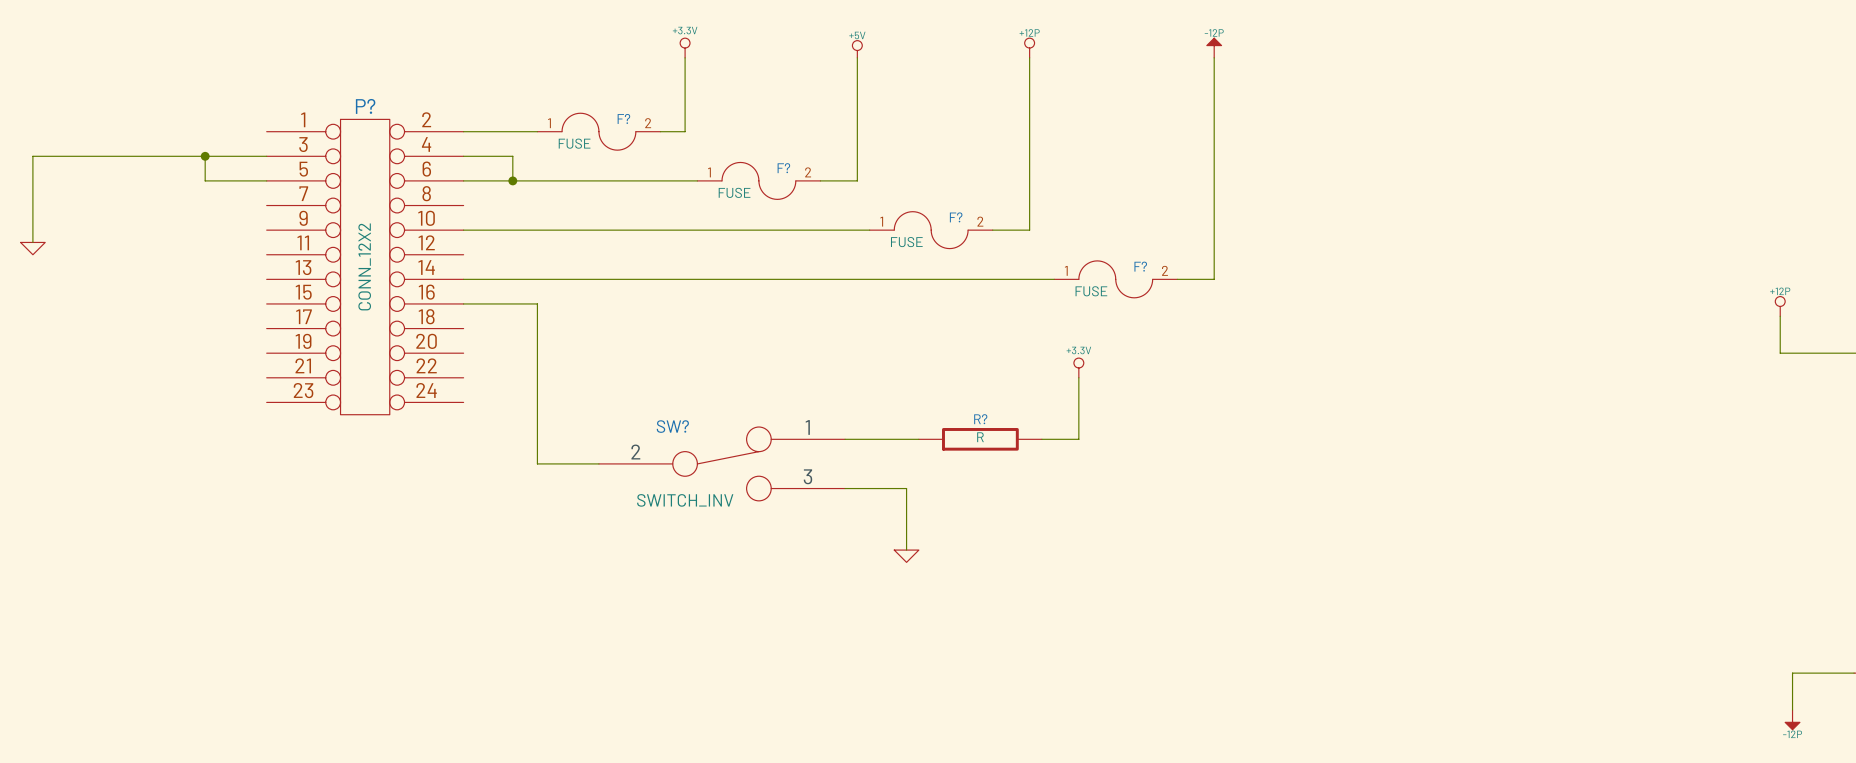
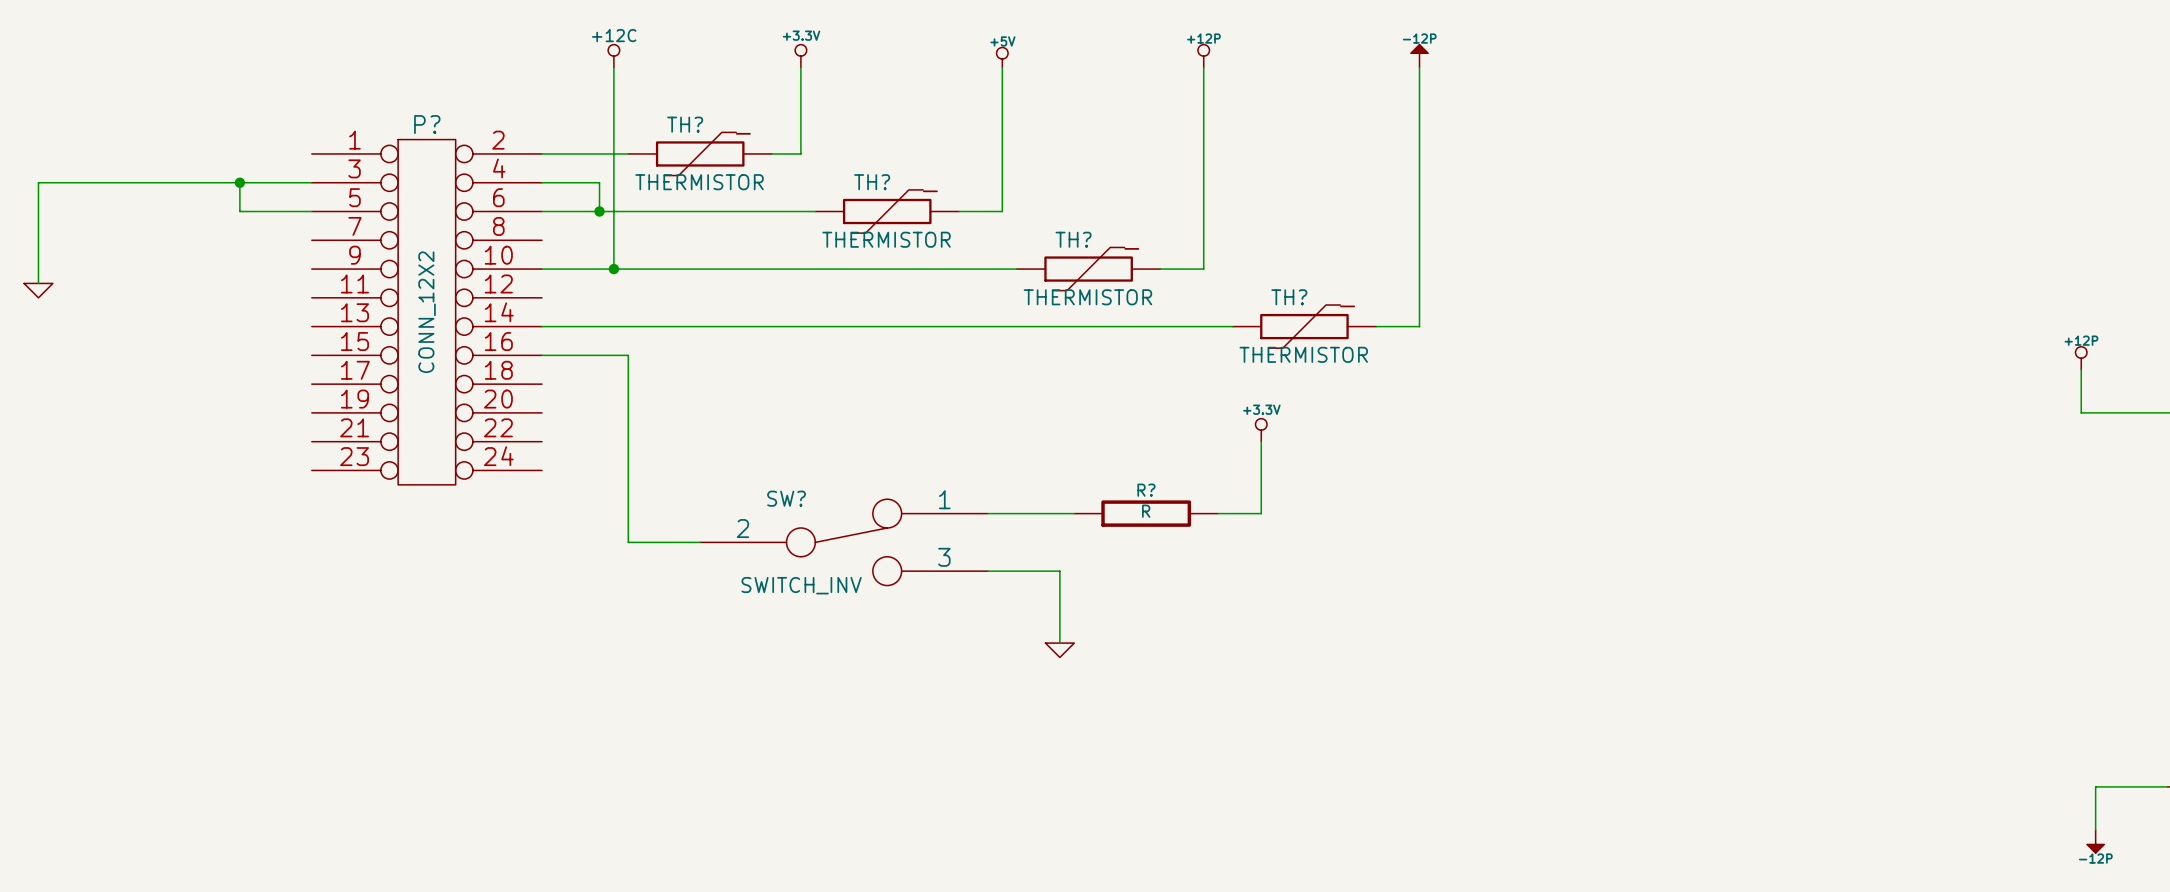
power symbol: none -> +12C (613, 56)
wire: none -> (613, 67) (613, 269)
F?: FUSE (598, 131) -> none
TH?: none -> THERMISTOR (700, 153)
F?: FUSE (758, 180) -> none
TH?: none -> THERMISTOR (887, 211)
junction: none -> (613, 269)
F?: FUSE (931, 230) -> none
TH?: none -> THERMISTOR (1088, 269)
F?: FUSE (1115, 279) -> none
TH?: none -> THERMISTOR (1304, 326)

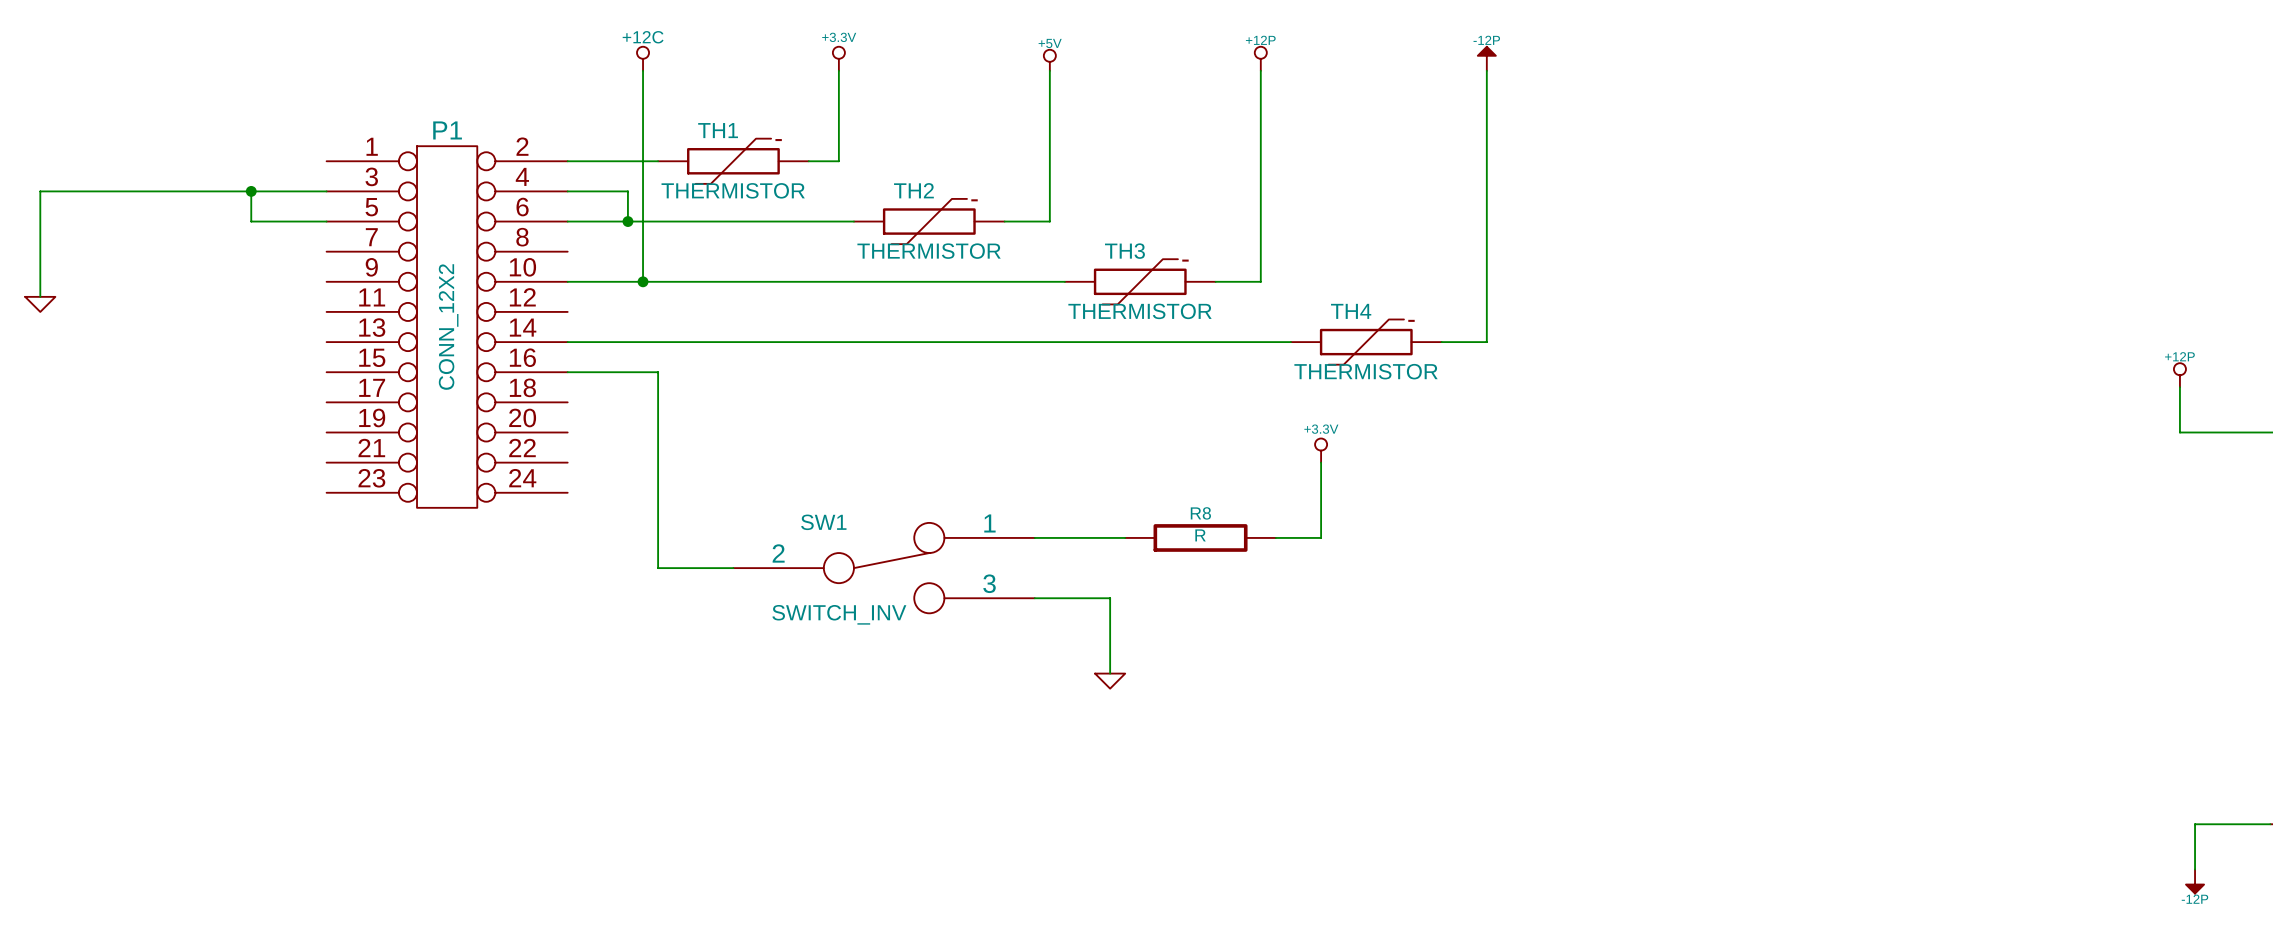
P? name: P? (427, 124) -> P1 (447, 130)
TH? name: TH? (685, 124) -> TH1 (718, 130)
TH? name: TH? (872, 182) -> TH2 (913, 190)
TH? name: TH? (1073, 239) -> TH3 (1124, 251)
TH? name: TH? (1289, 297) -> TH4 (1351, 311)
R? name: R? (1146, 490) -> R8 (1200, 513)
SW? name: SW? (786, 498) -> SW1 (823, 522)

